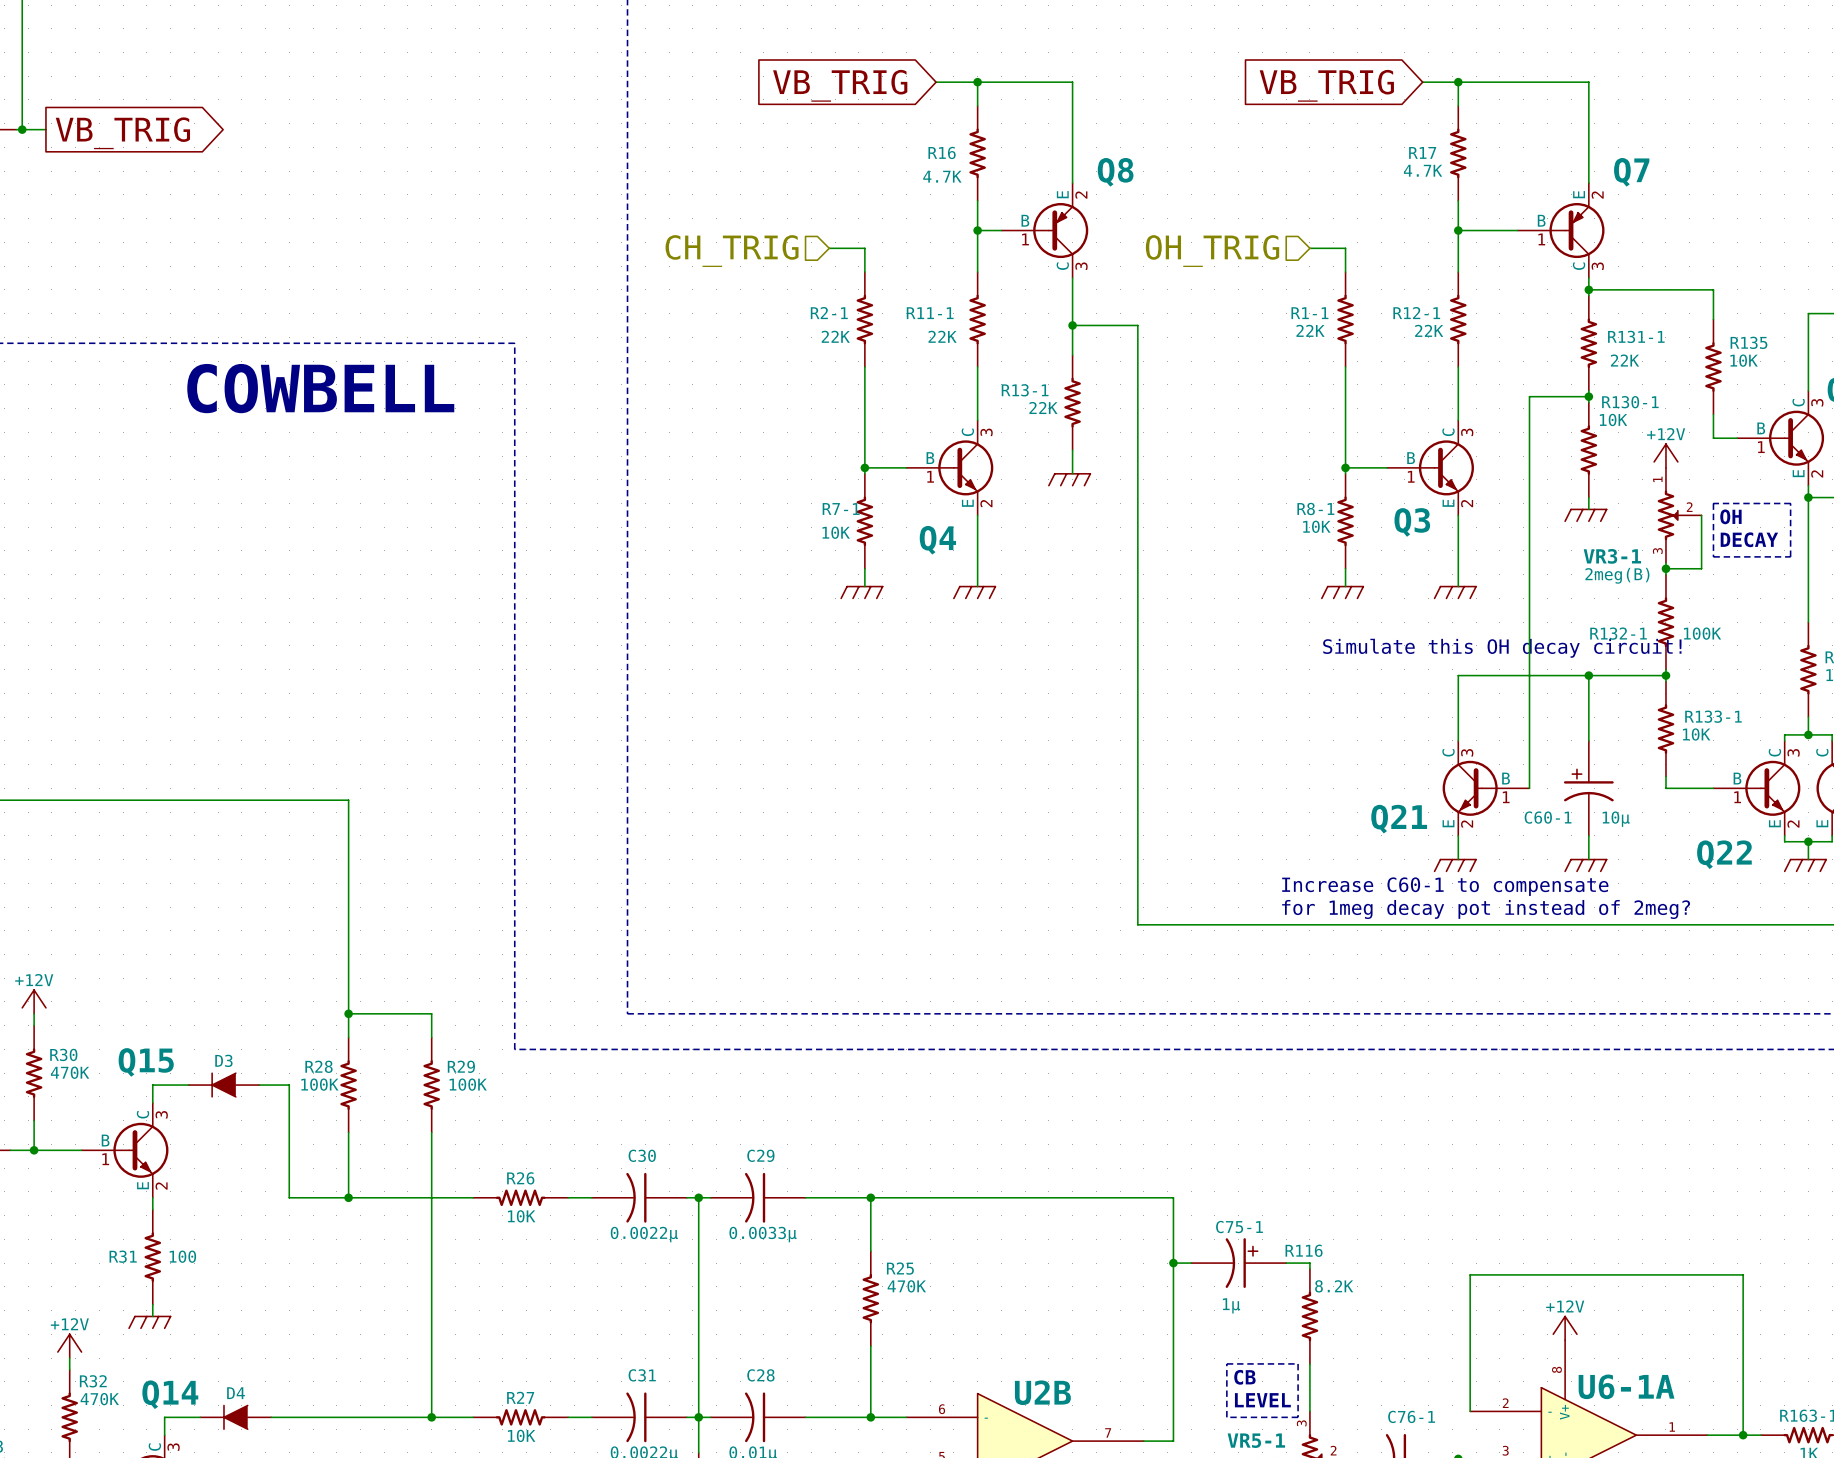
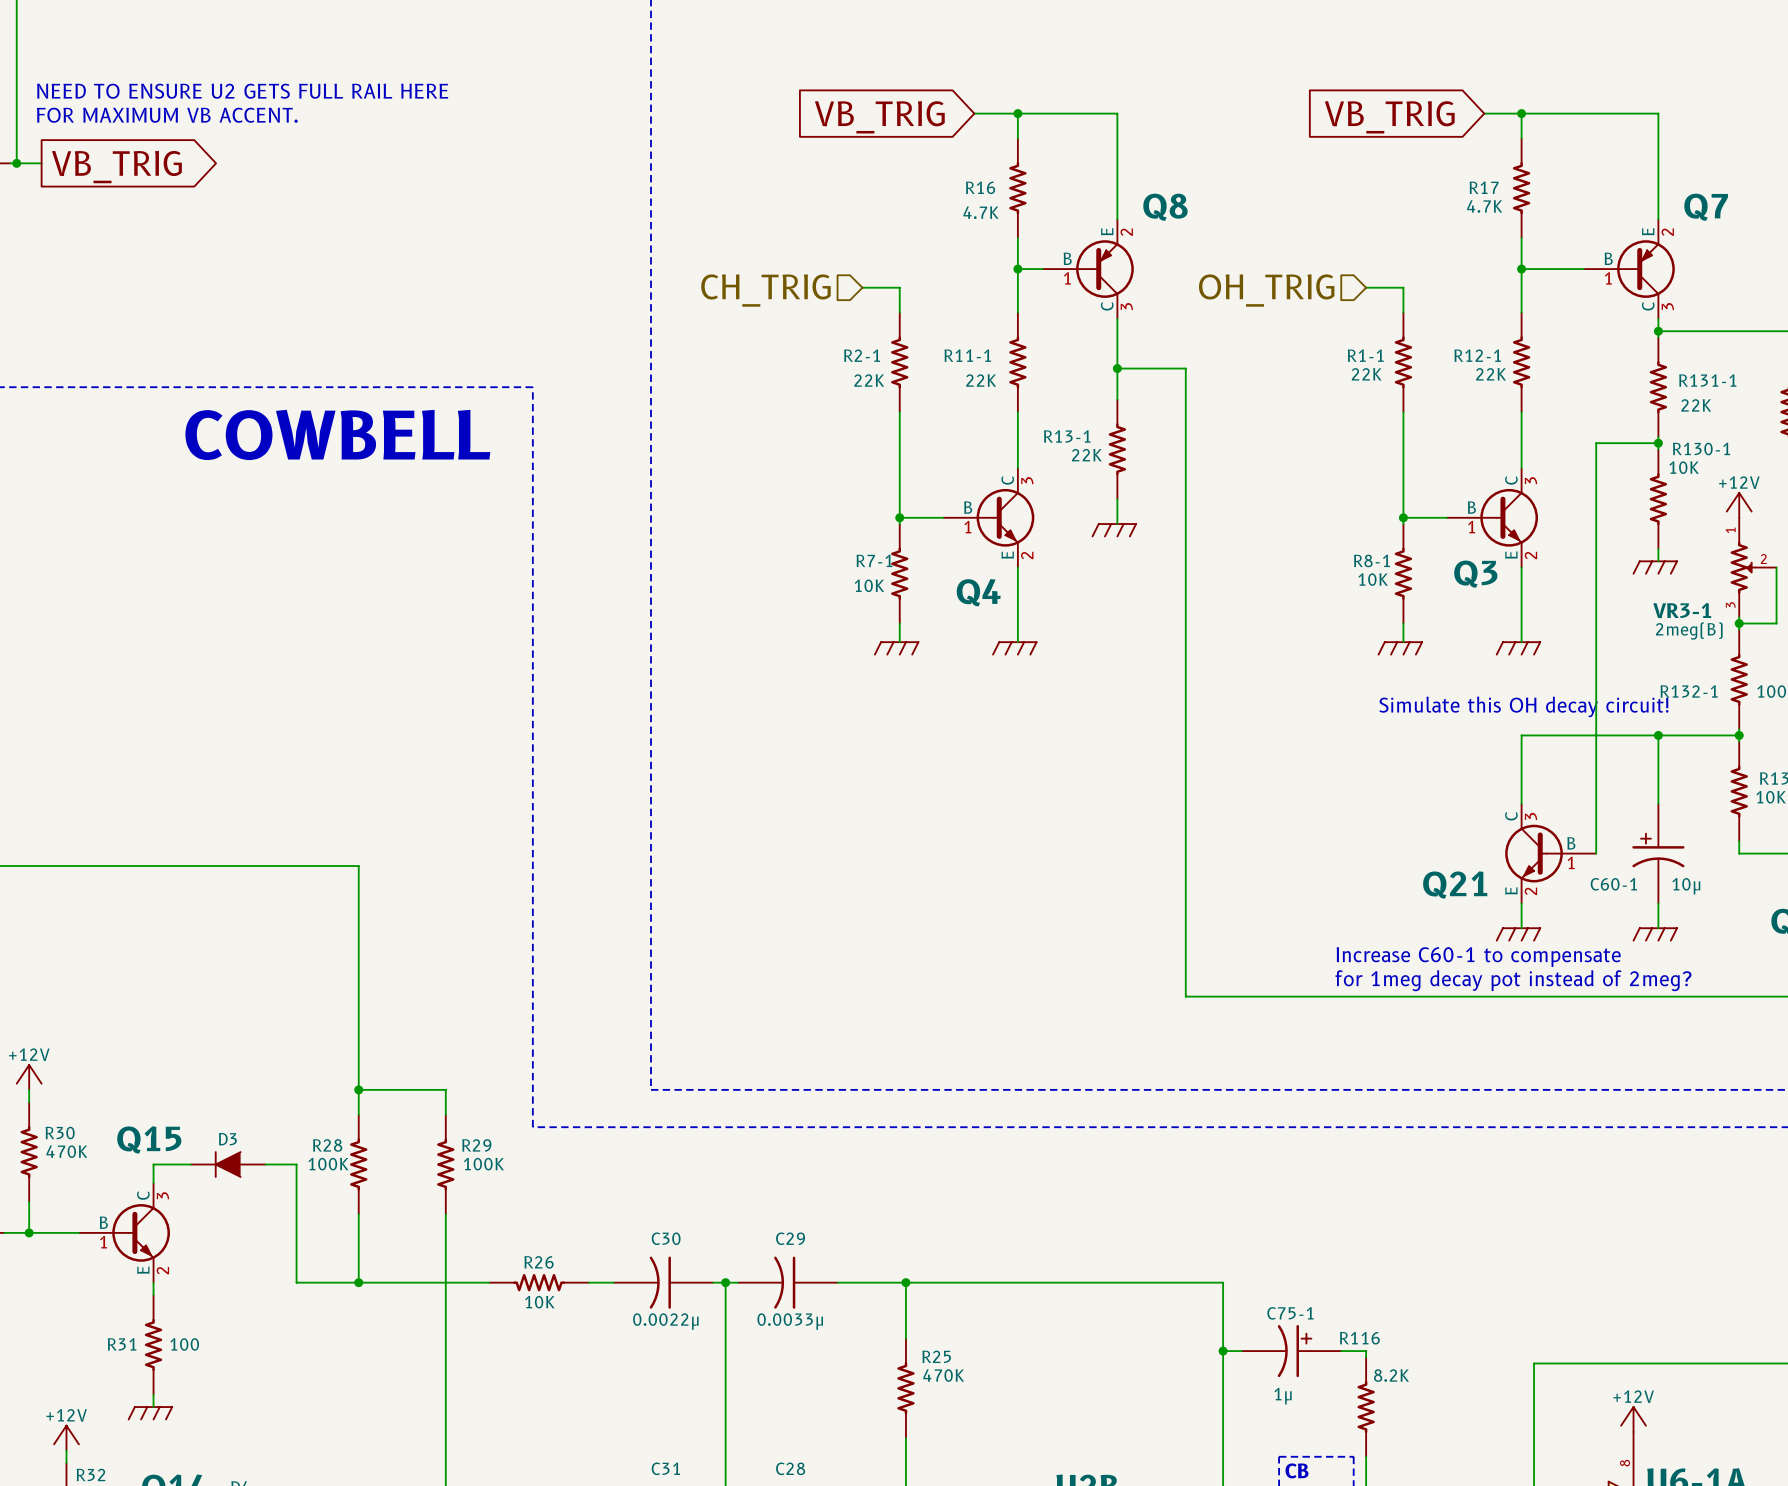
text: none -> NEED TO ENSURE U2 GETS FULL RAIL HERE (242, 91)
text: none -> FOR MAXIMUM VB ACCENT. (167, 115)

